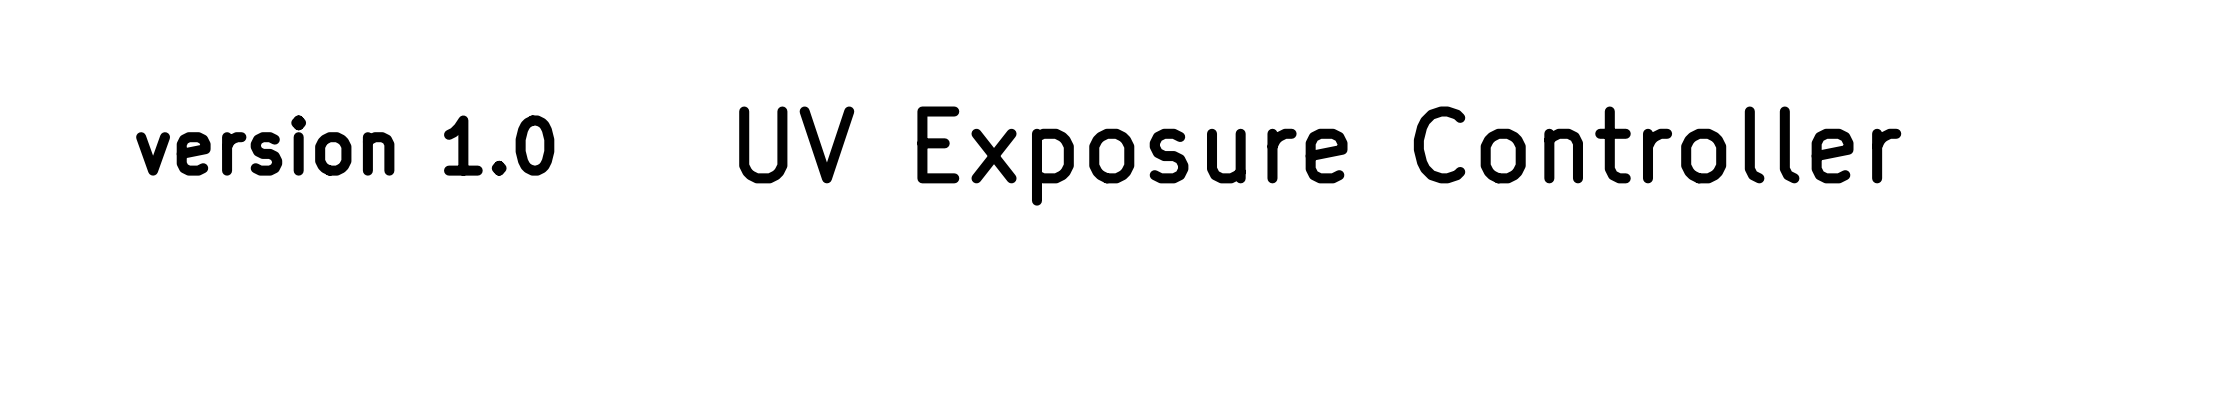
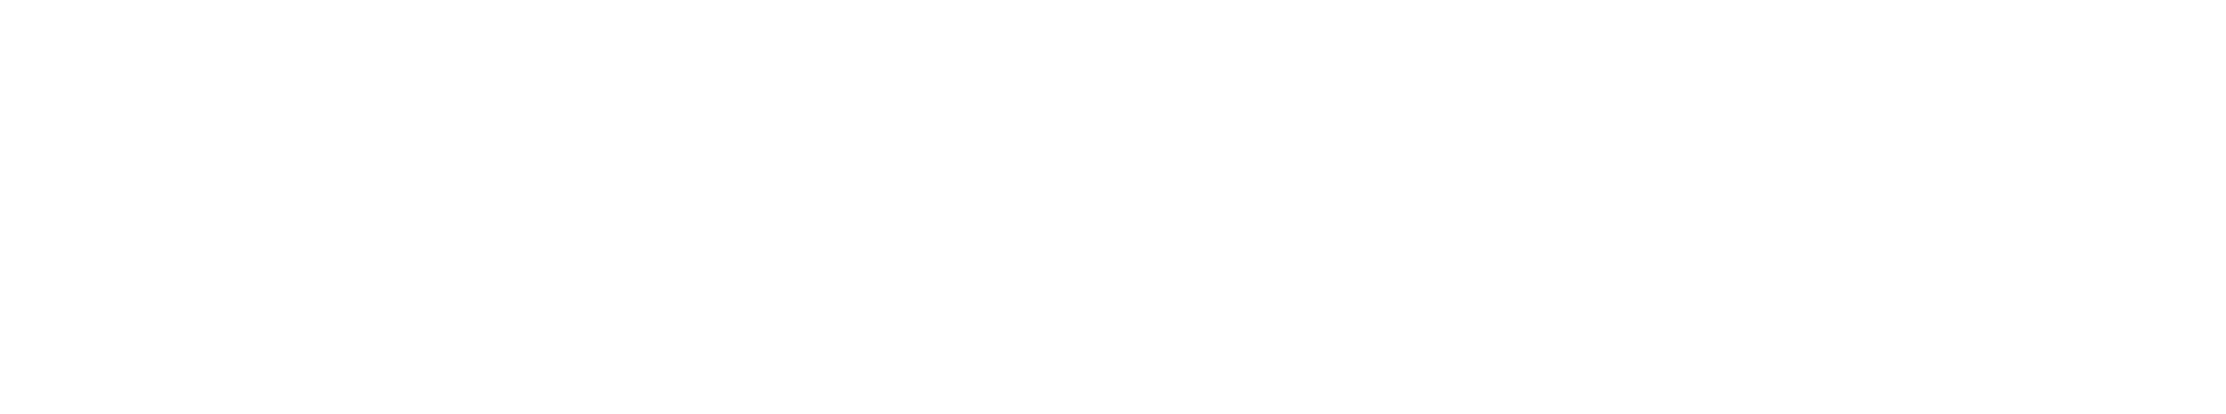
text: version 1.0 (345, 145) -> none
text: UV Exposure Controller (1320, 156) -> none

